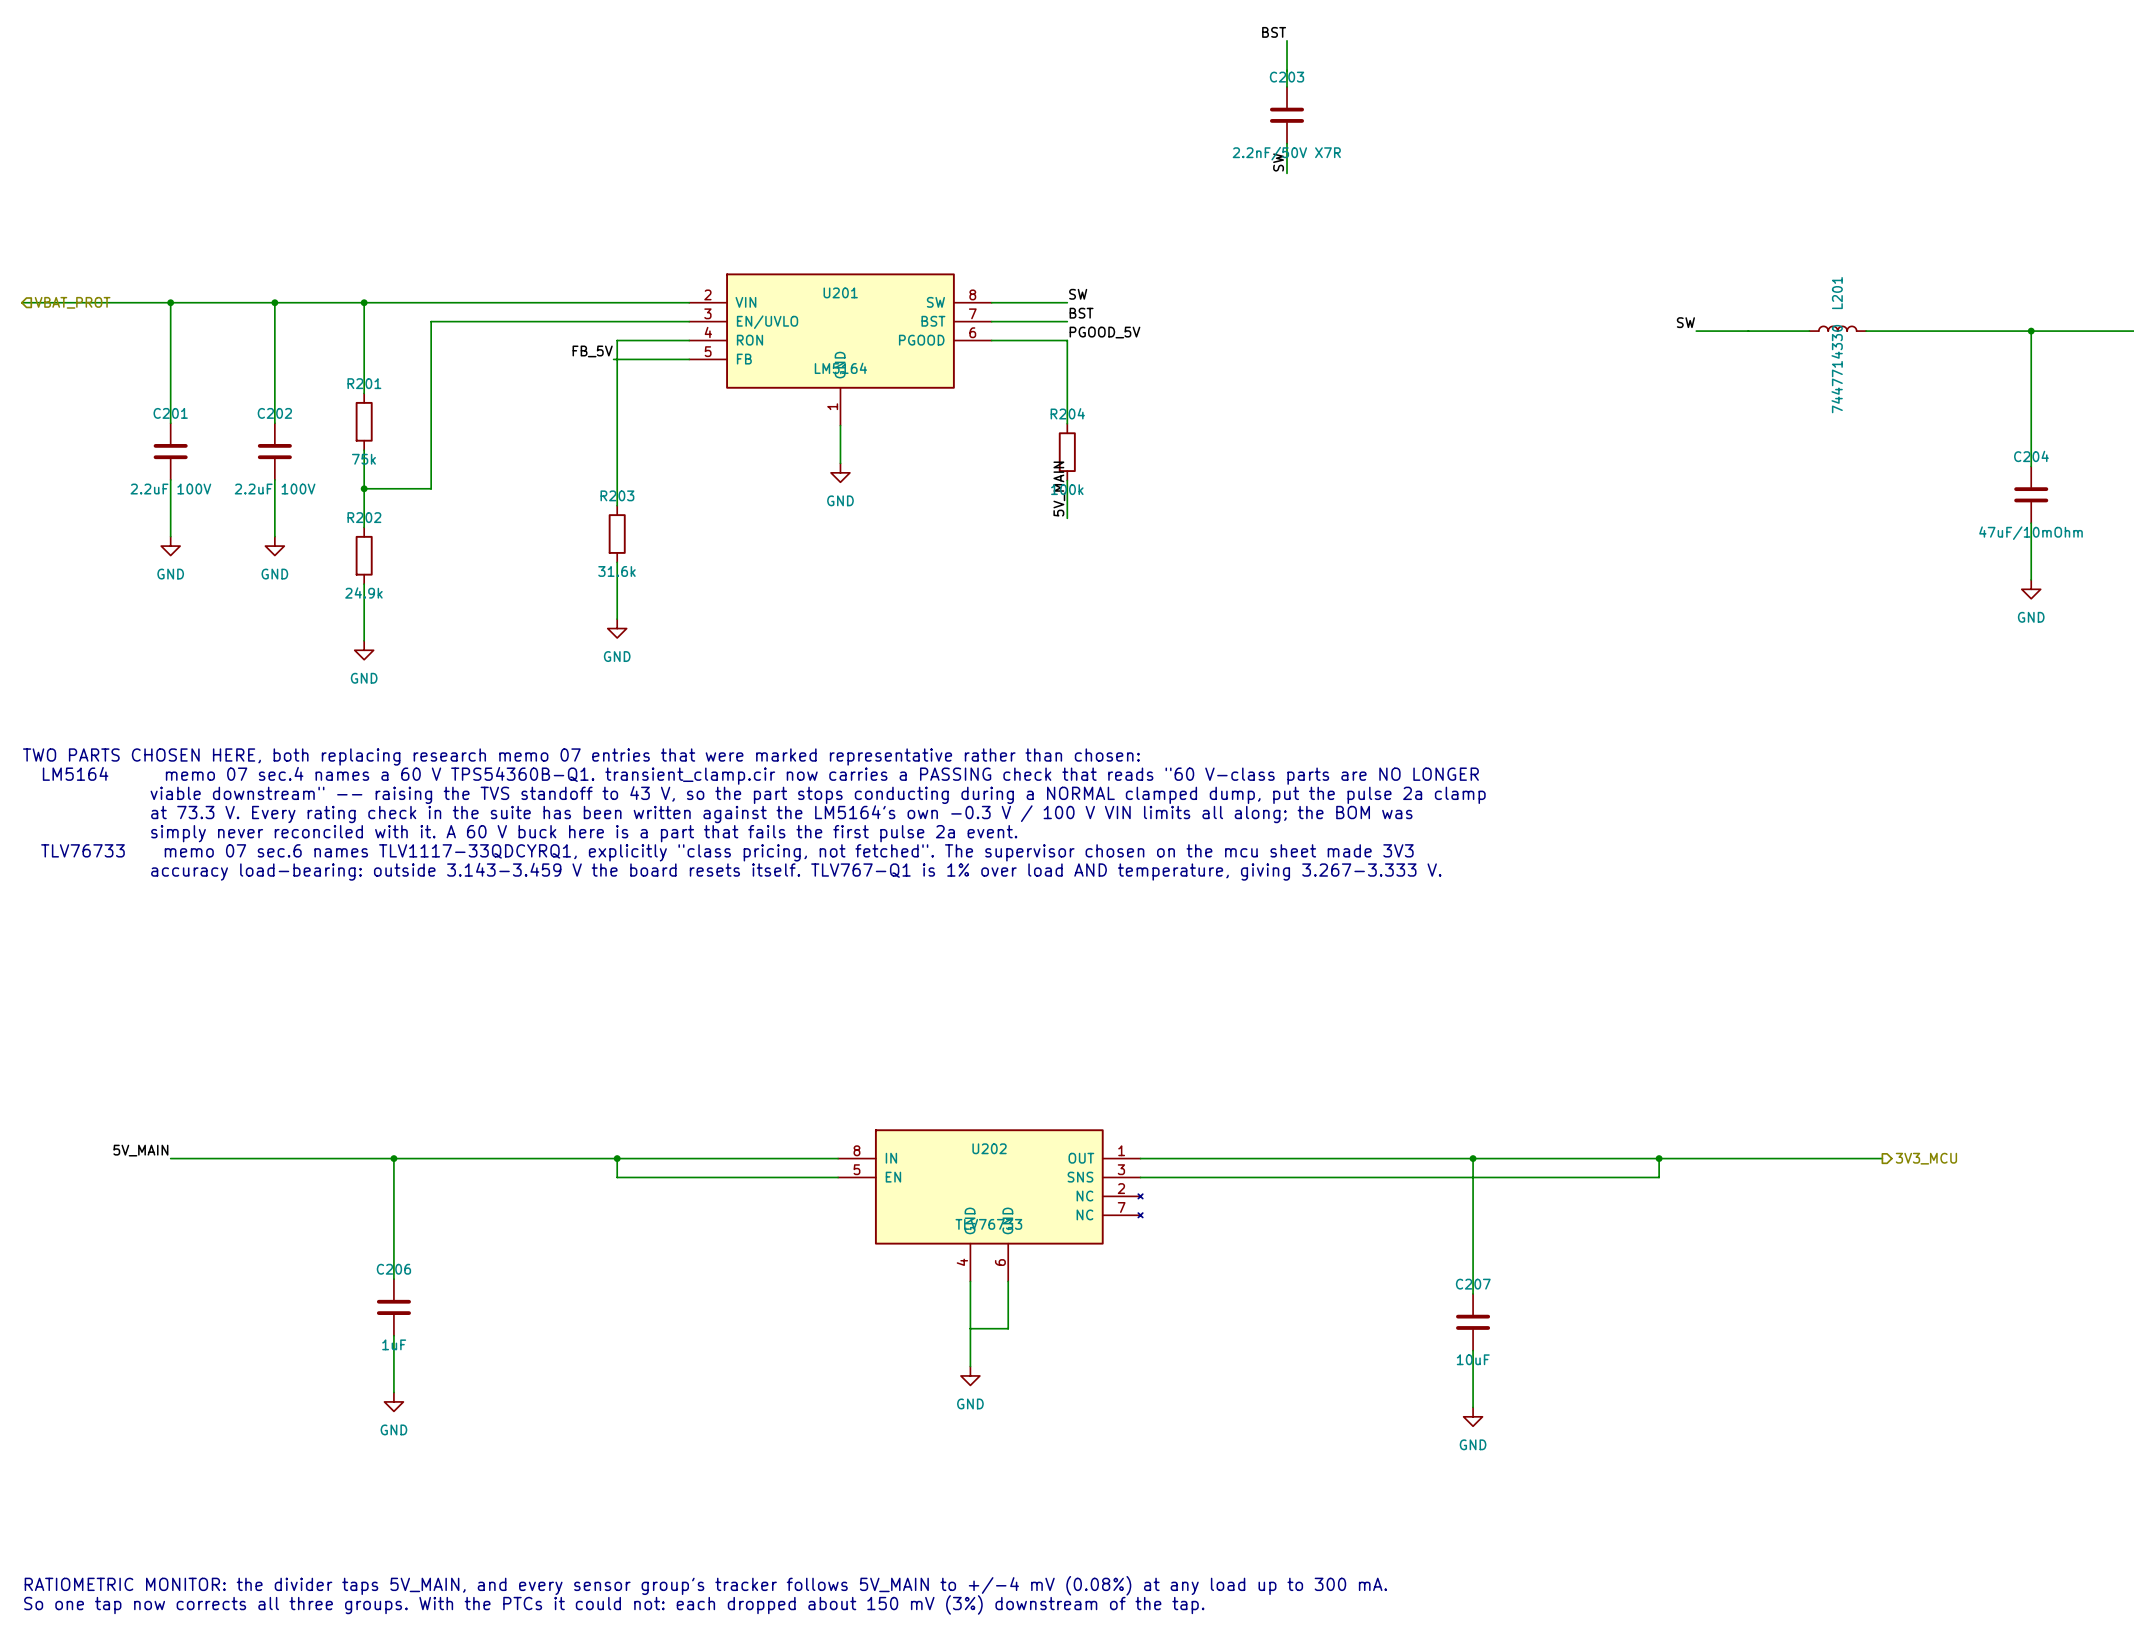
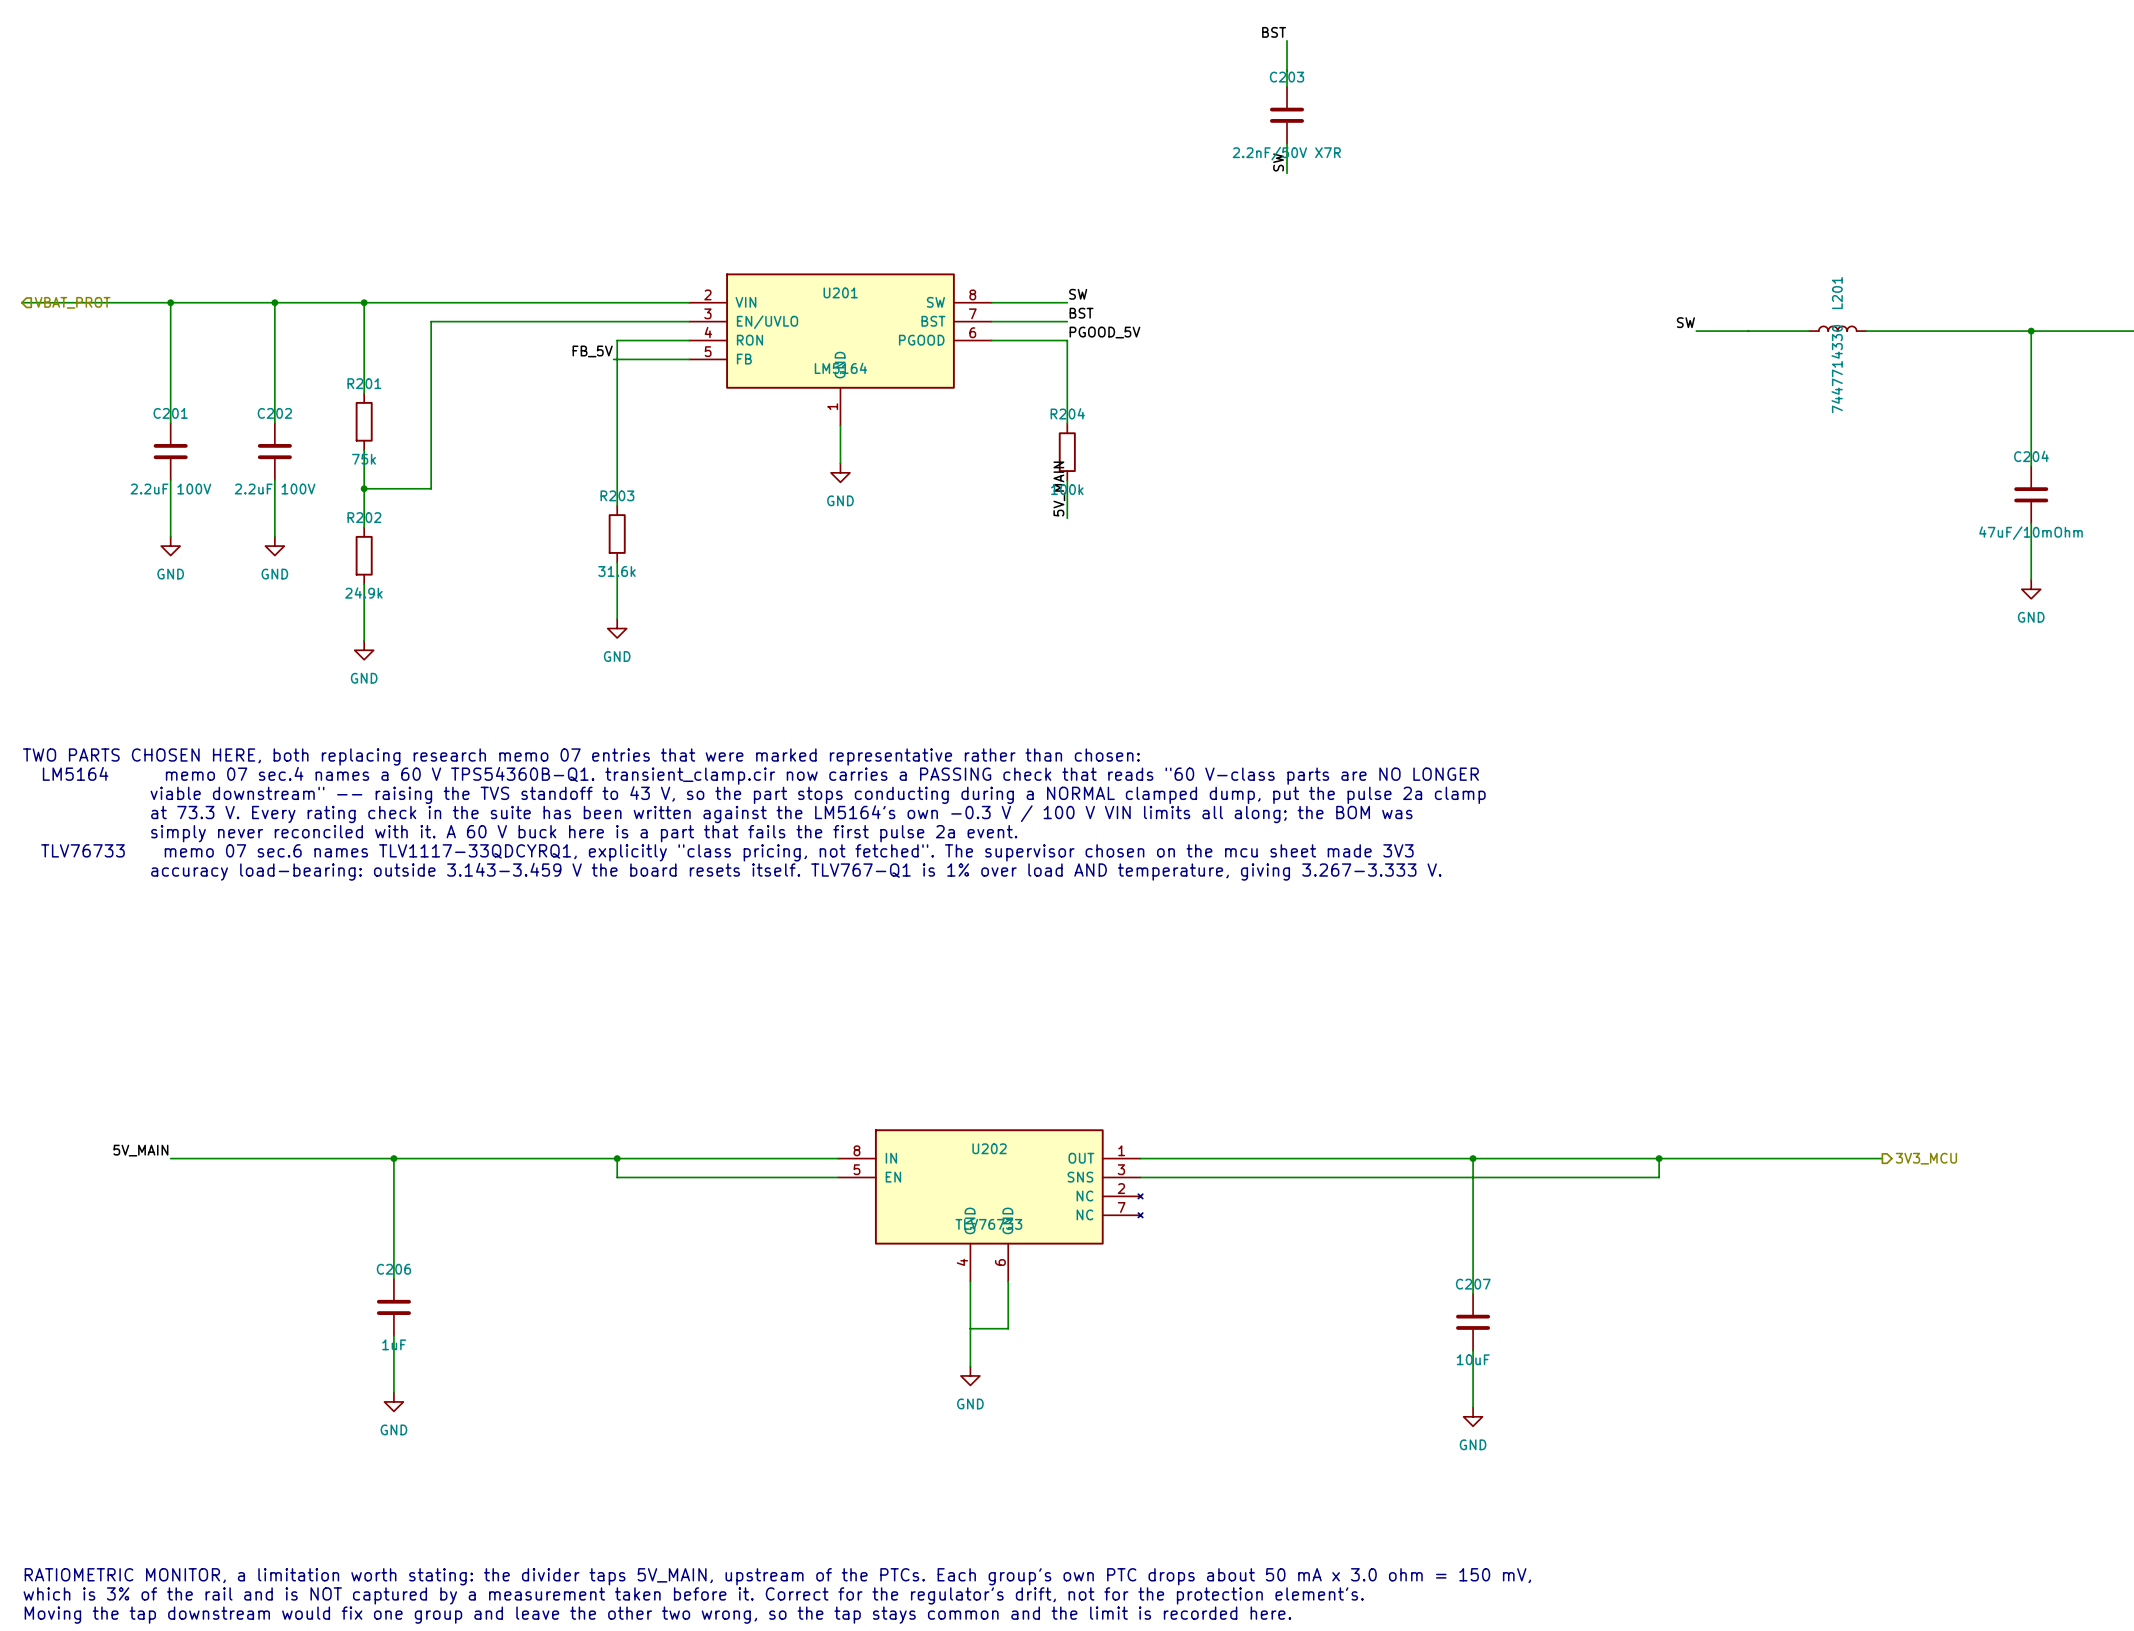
text: none -> RATIOMETRIC MONITOR, a limitation worth stating: the divider taps 5V_MAIN, upstream of the PTCs. Each group's own PTC drops about 50 mA x 3.0 ohm = 150 mV, (777, 1576)
text: RATIOMETRIC MONITOR: the divider taps 5V_MAIN, and every sensor group's tracker follows 5V_MAIN to +/-4 mV (0.08%) at any load up to 300 mA. (705, 1585) -> none
text: none -> which is 3% of the rail and is NOT captured by a measurement taken before it. Correct for the regulator's drift, not for the protection element's. (693, 1595)
text: So one tap now corrects all three groups. With the PTCs it could not: each dropped about 150 mV (3%) downstream of the tap. (614, 1604) -> none
text: none -> Moving the tap downstream would fix one group and leave the other two wrong, so the tap stays common and the limit is recorded here. (657, 1615)

